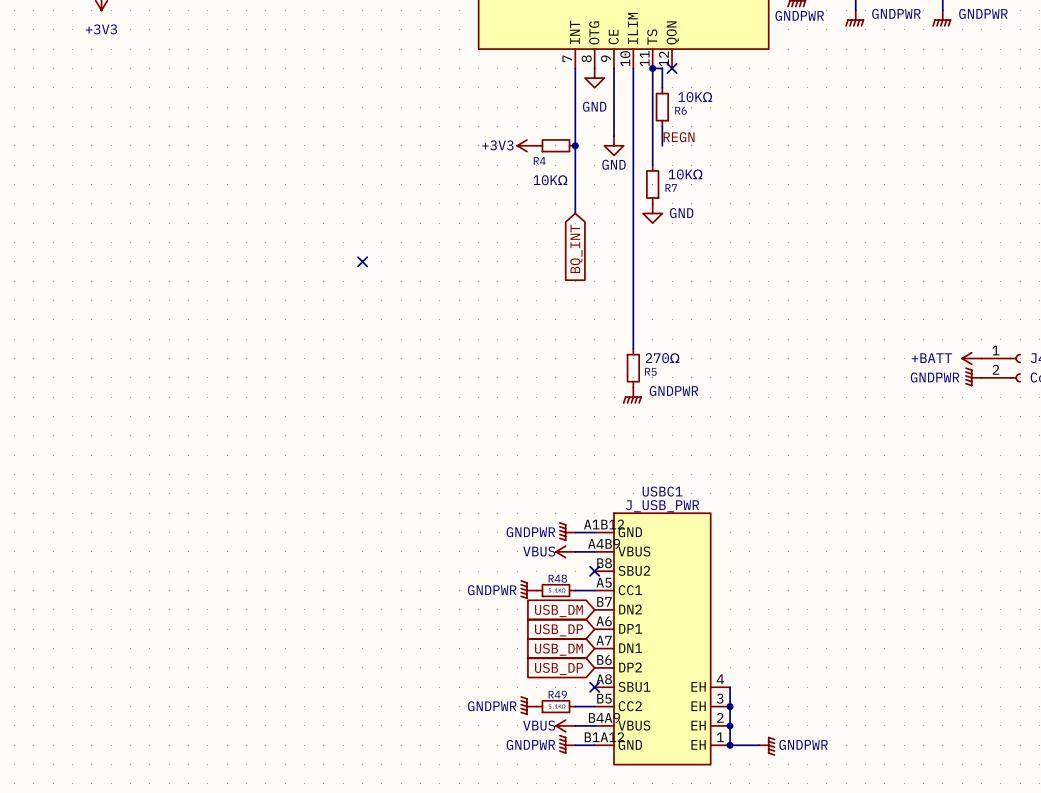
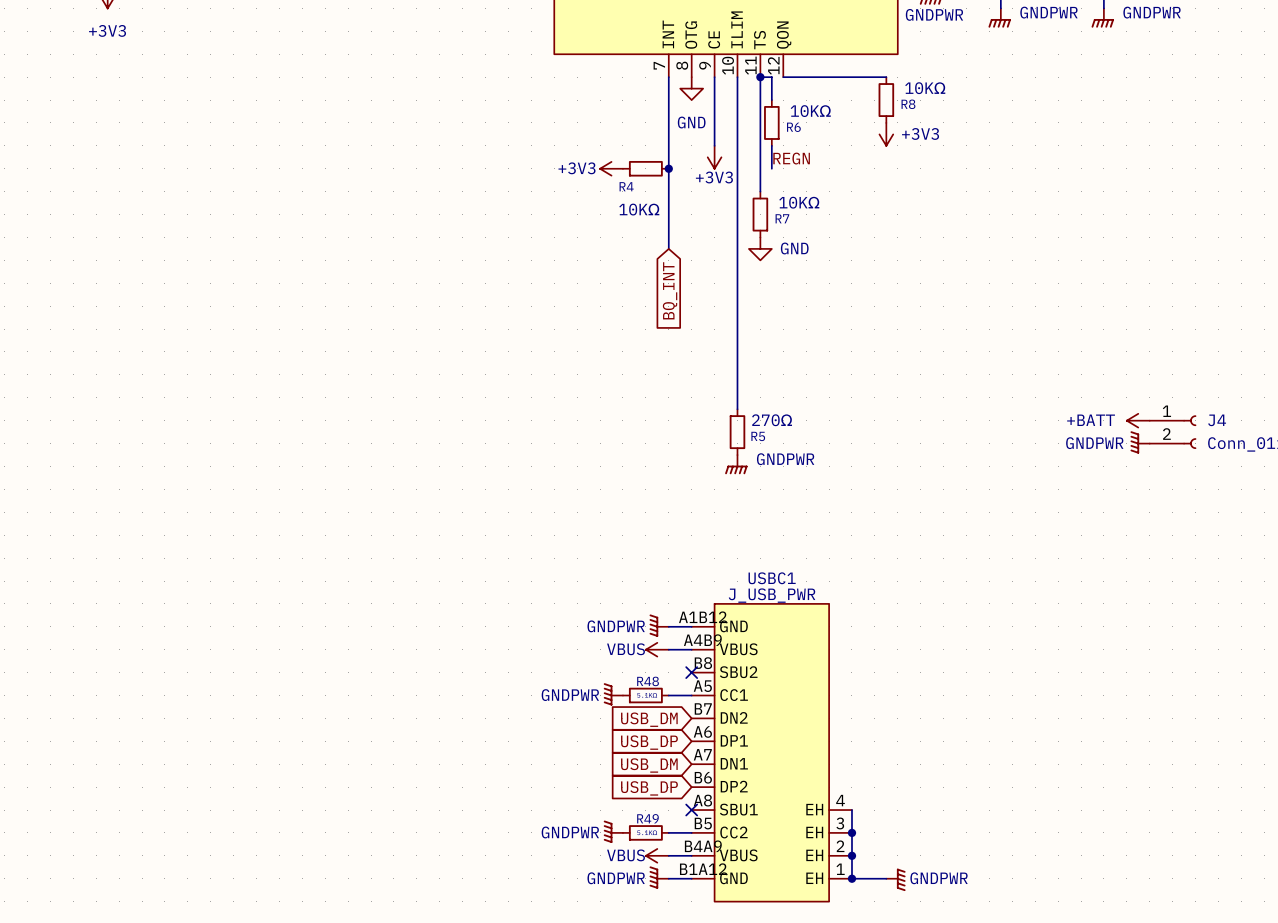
wire: none -> (783, 77) (886, 77)
no-connect mark: (672, 68) -> none
R8: none -> 10KΩ (886, 100)
power symbol: none -> +3V3 (886, 134)
power symbol: none -> +3V3 (714, 157)
power symbol: GND (614, 145) -> none
no-connect mark: (362, 261) -> none

